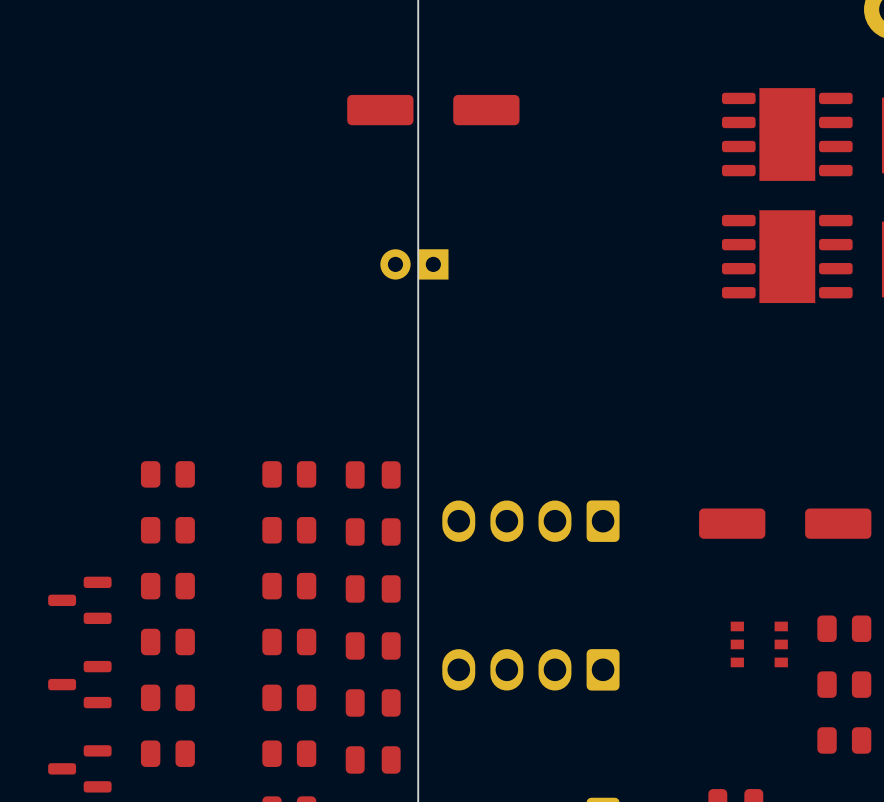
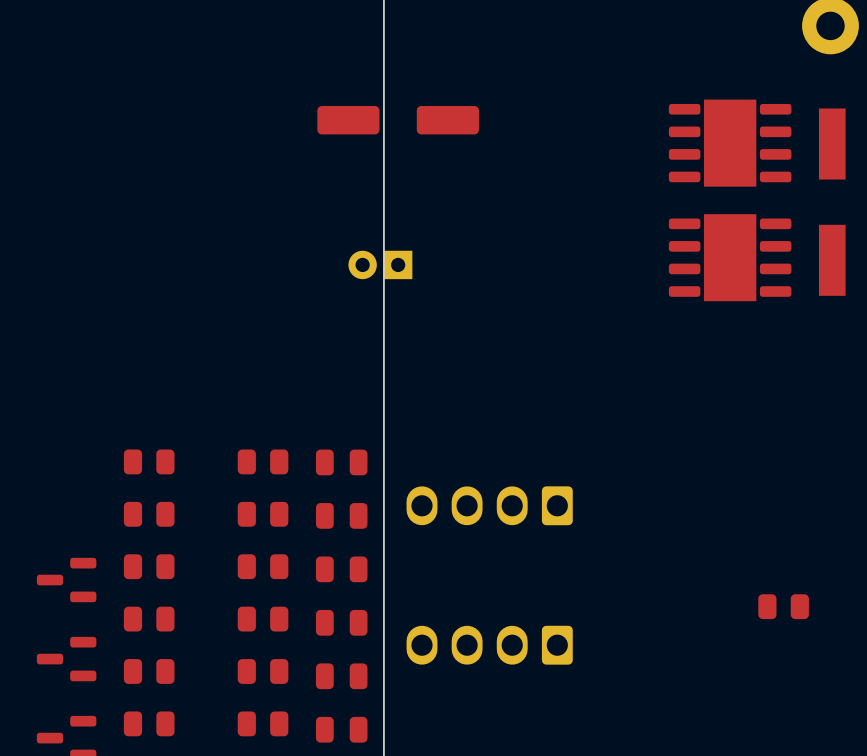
part: (785, 523) -> none
part: (759, 644) -> none
part: (844, 684) -> none
part: (844, 740) -> none

